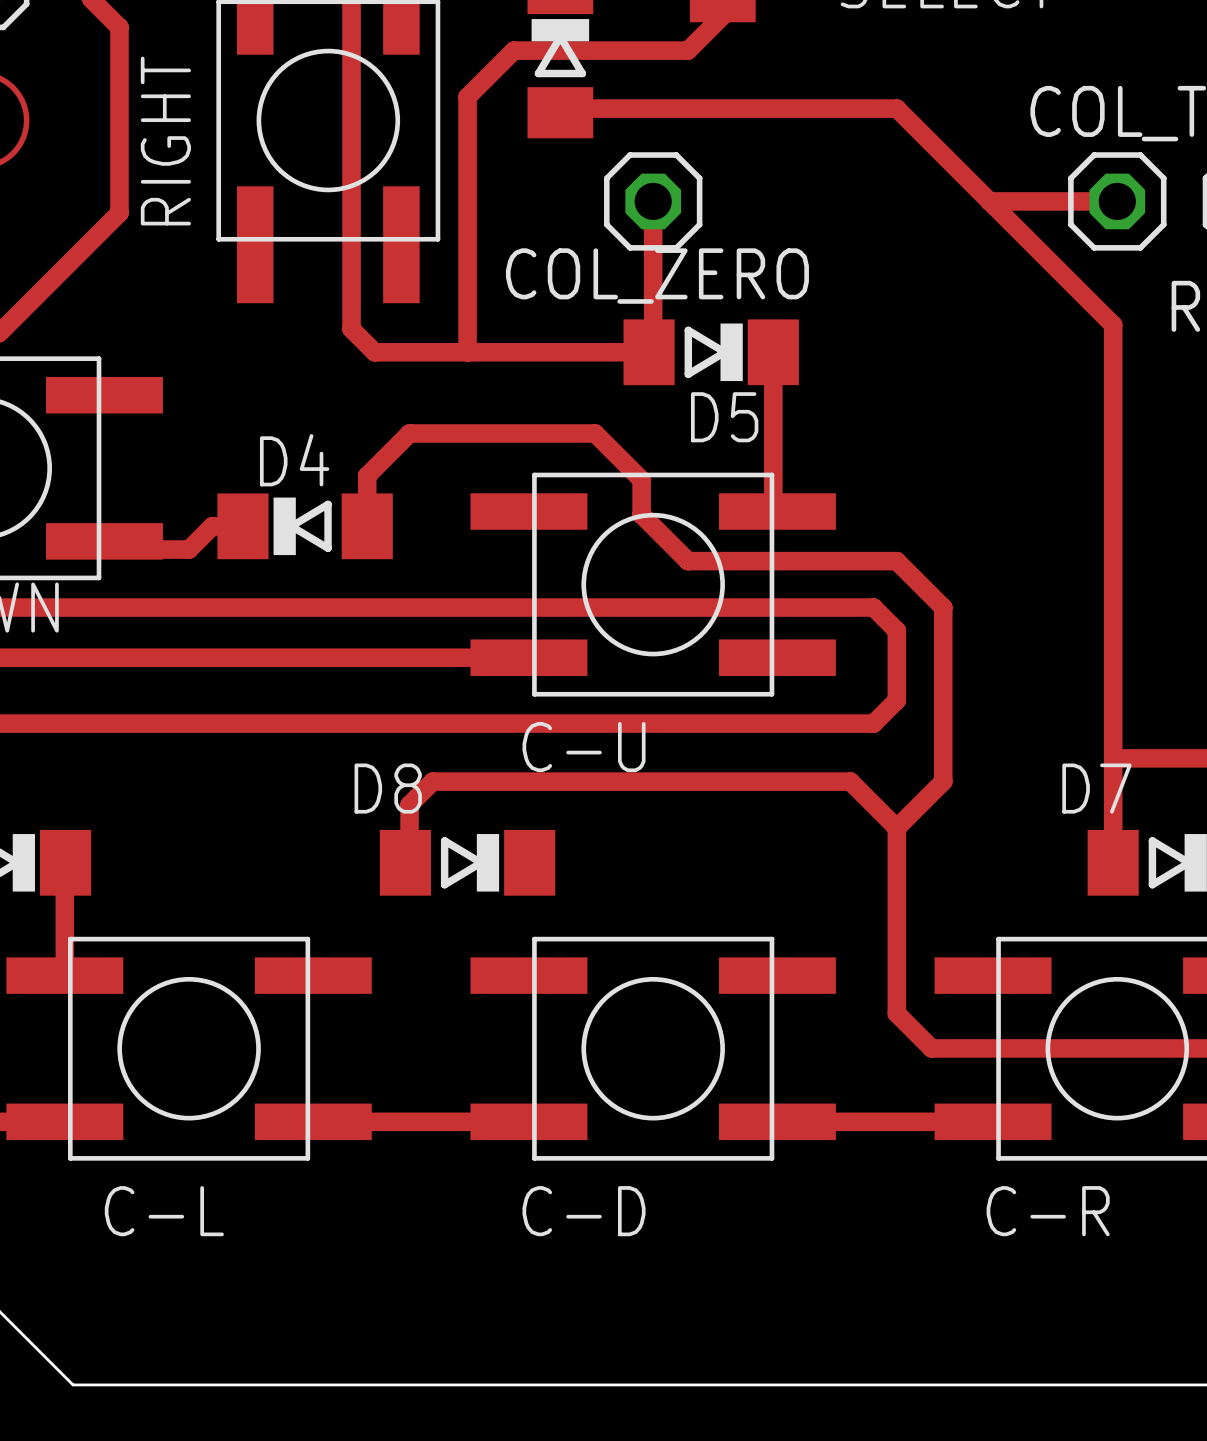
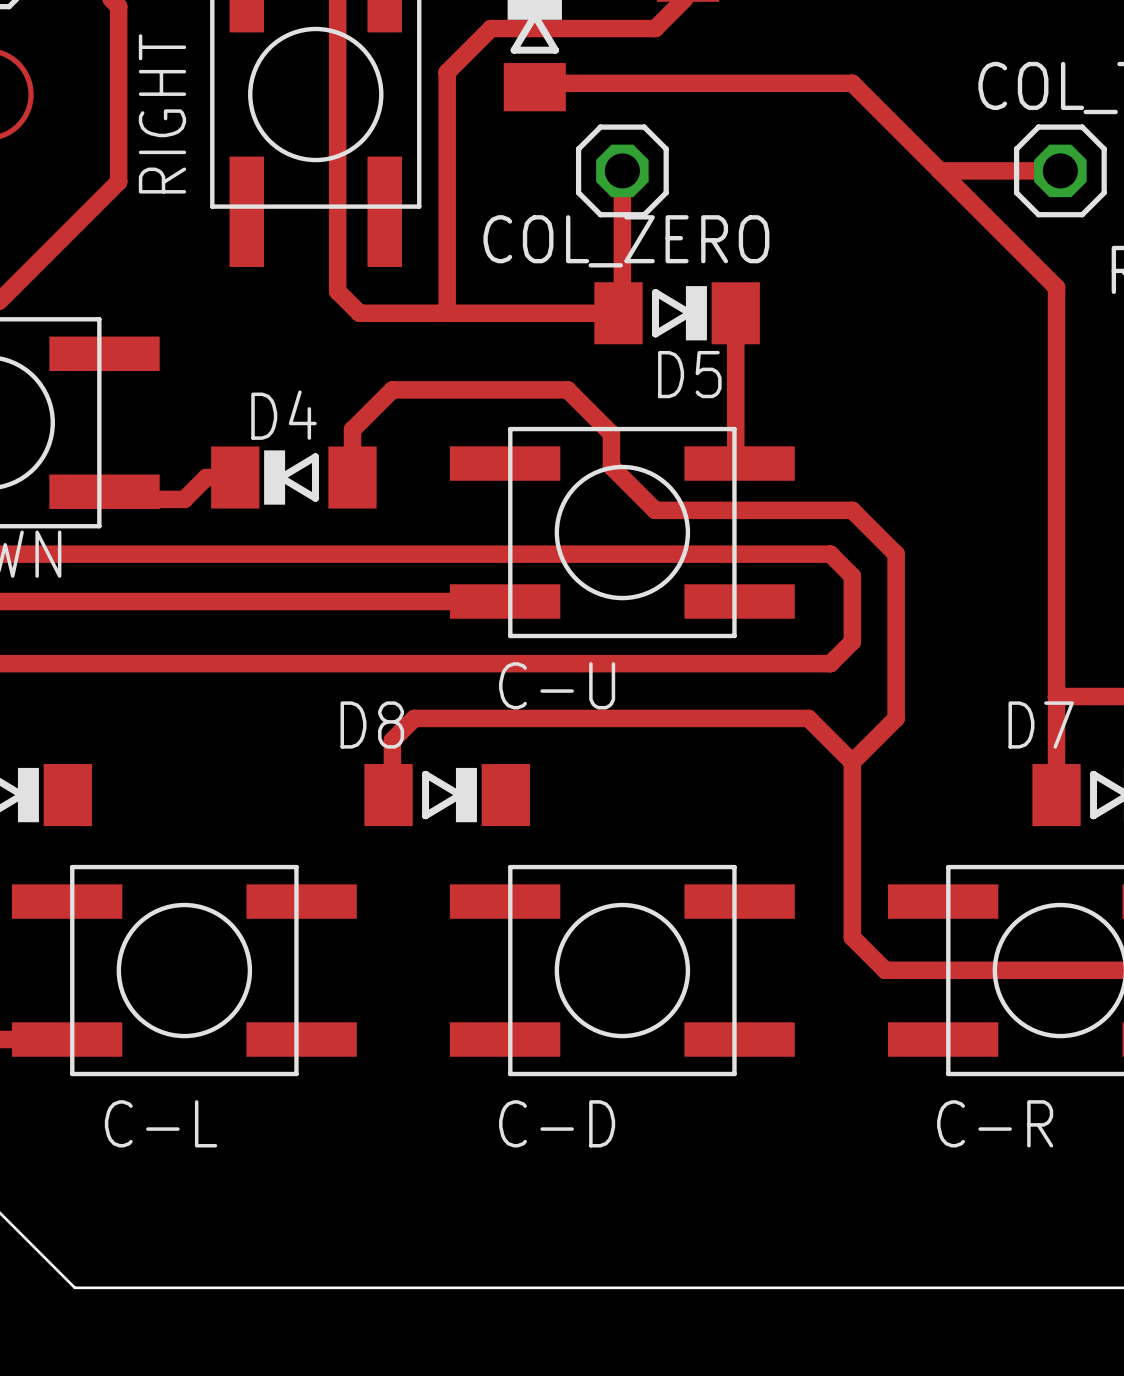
track: (65, 862) (65, 974) -> none
track: (313, 1121) (528, 1121) -> none
track: (777, 1121) (993, 1121) -> none

